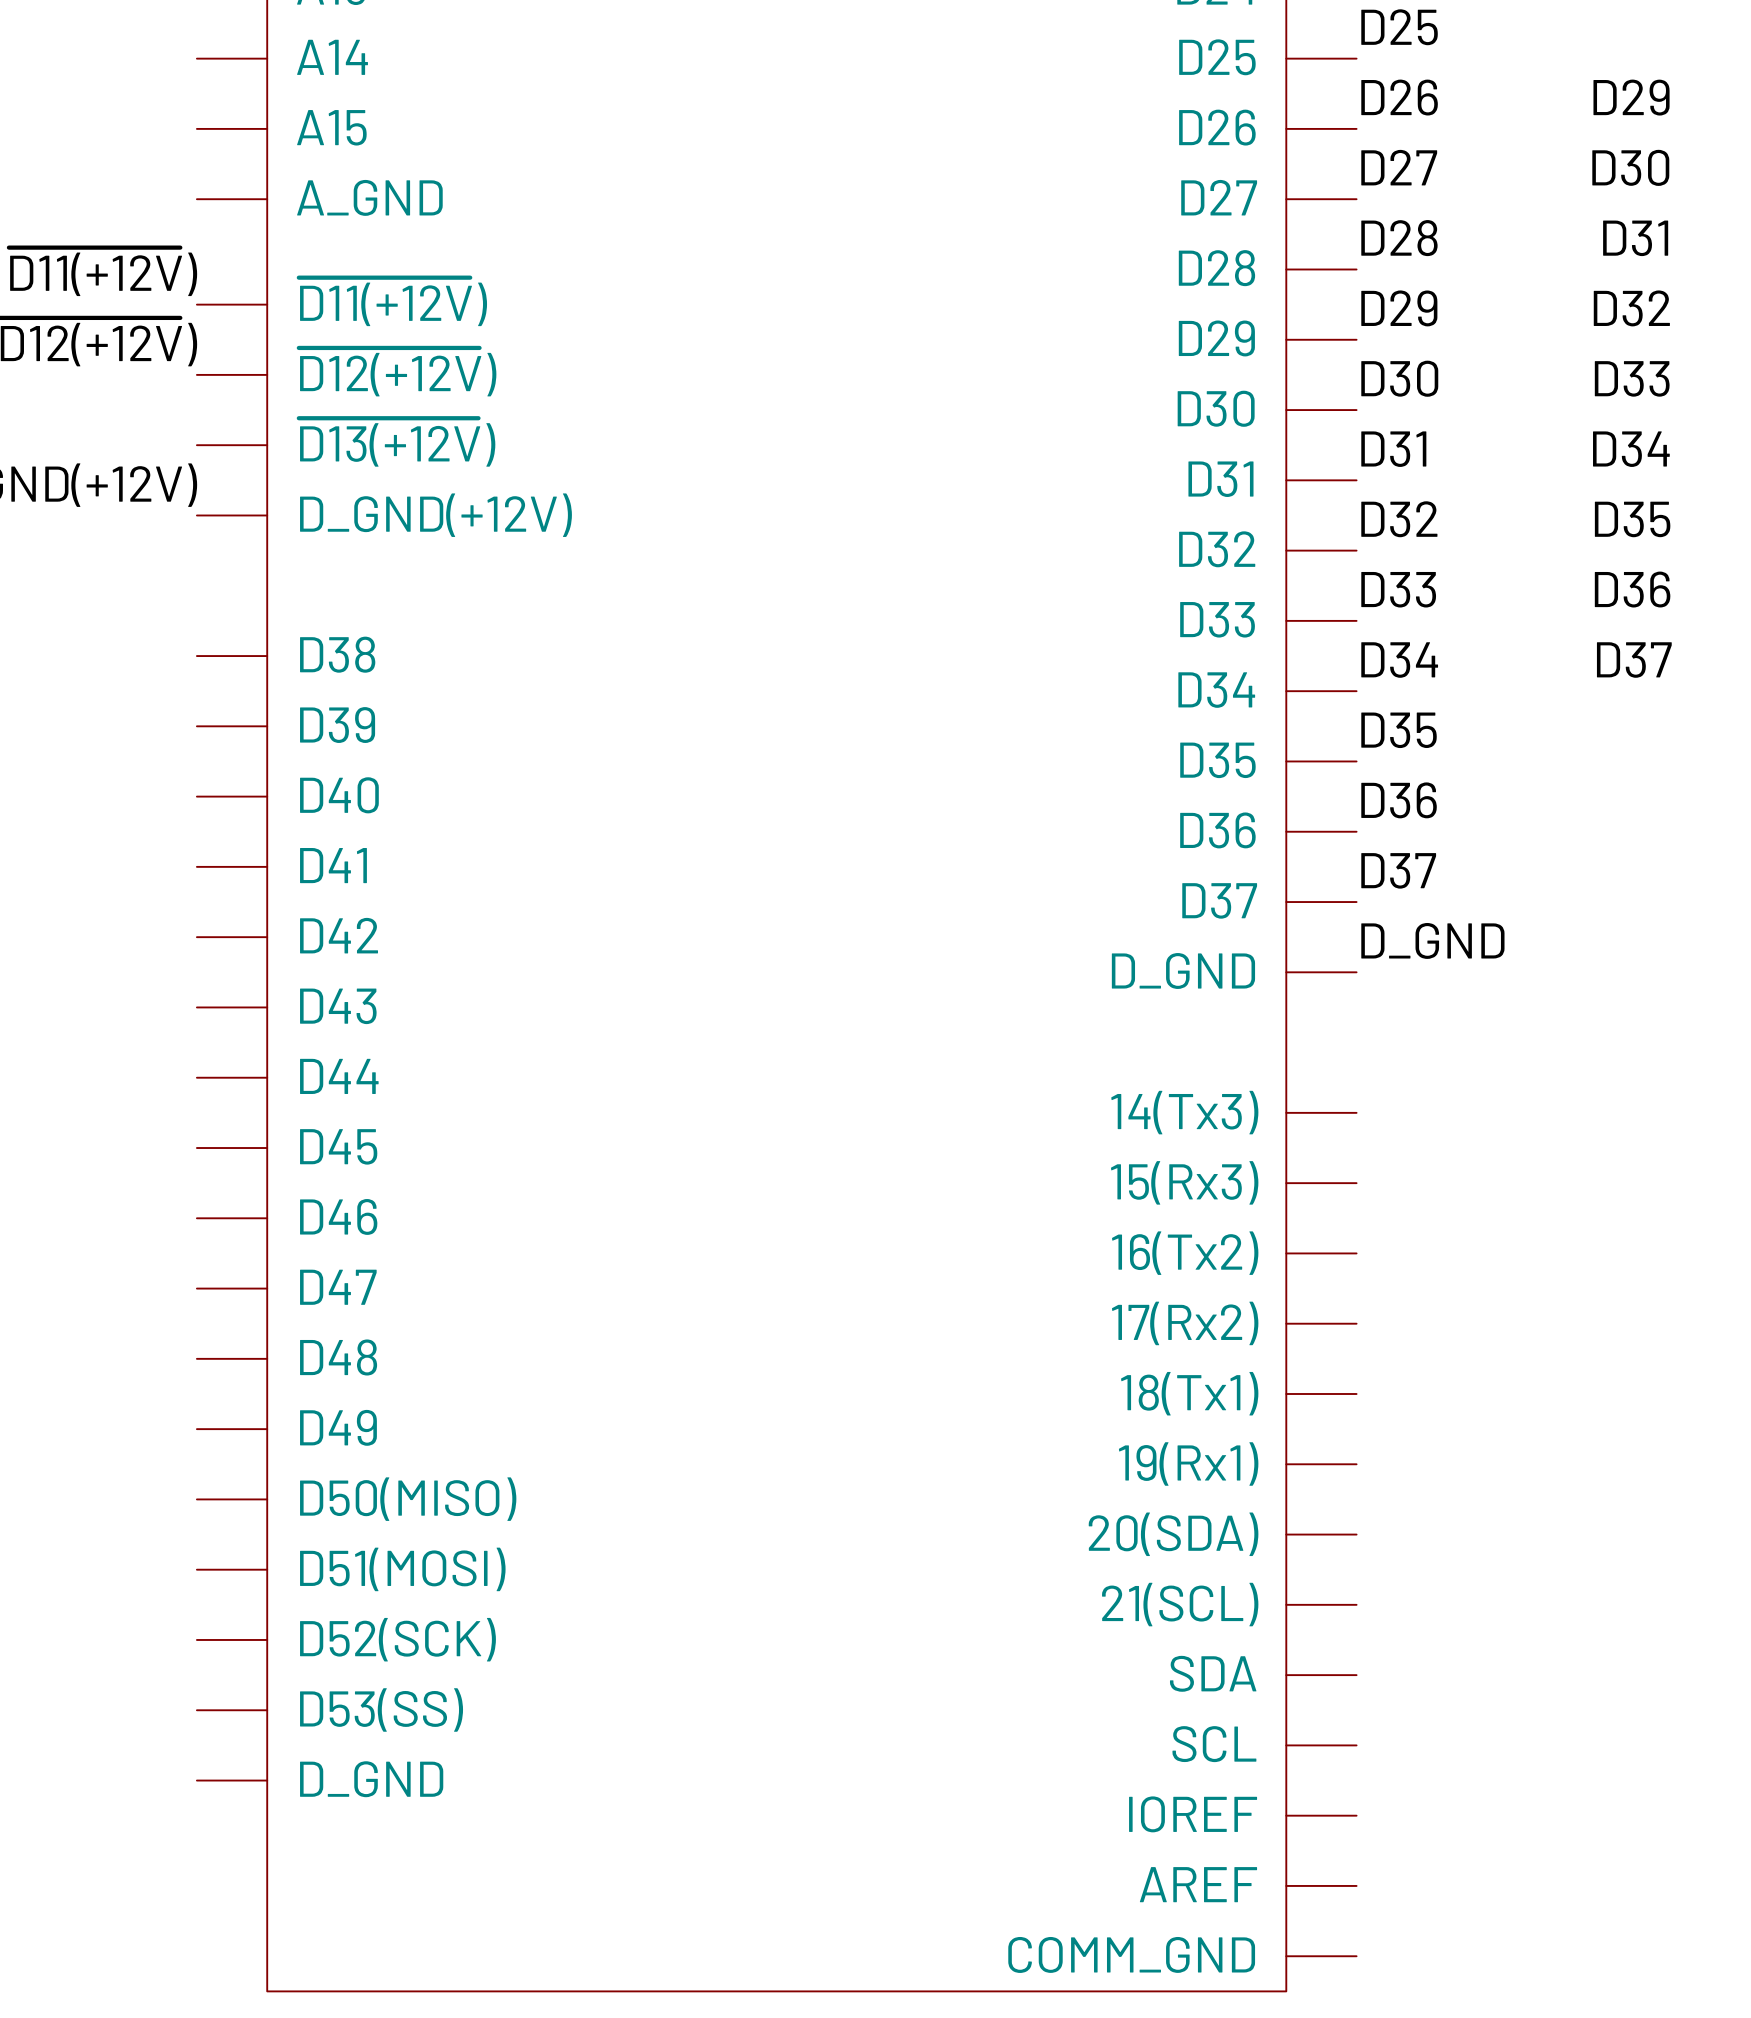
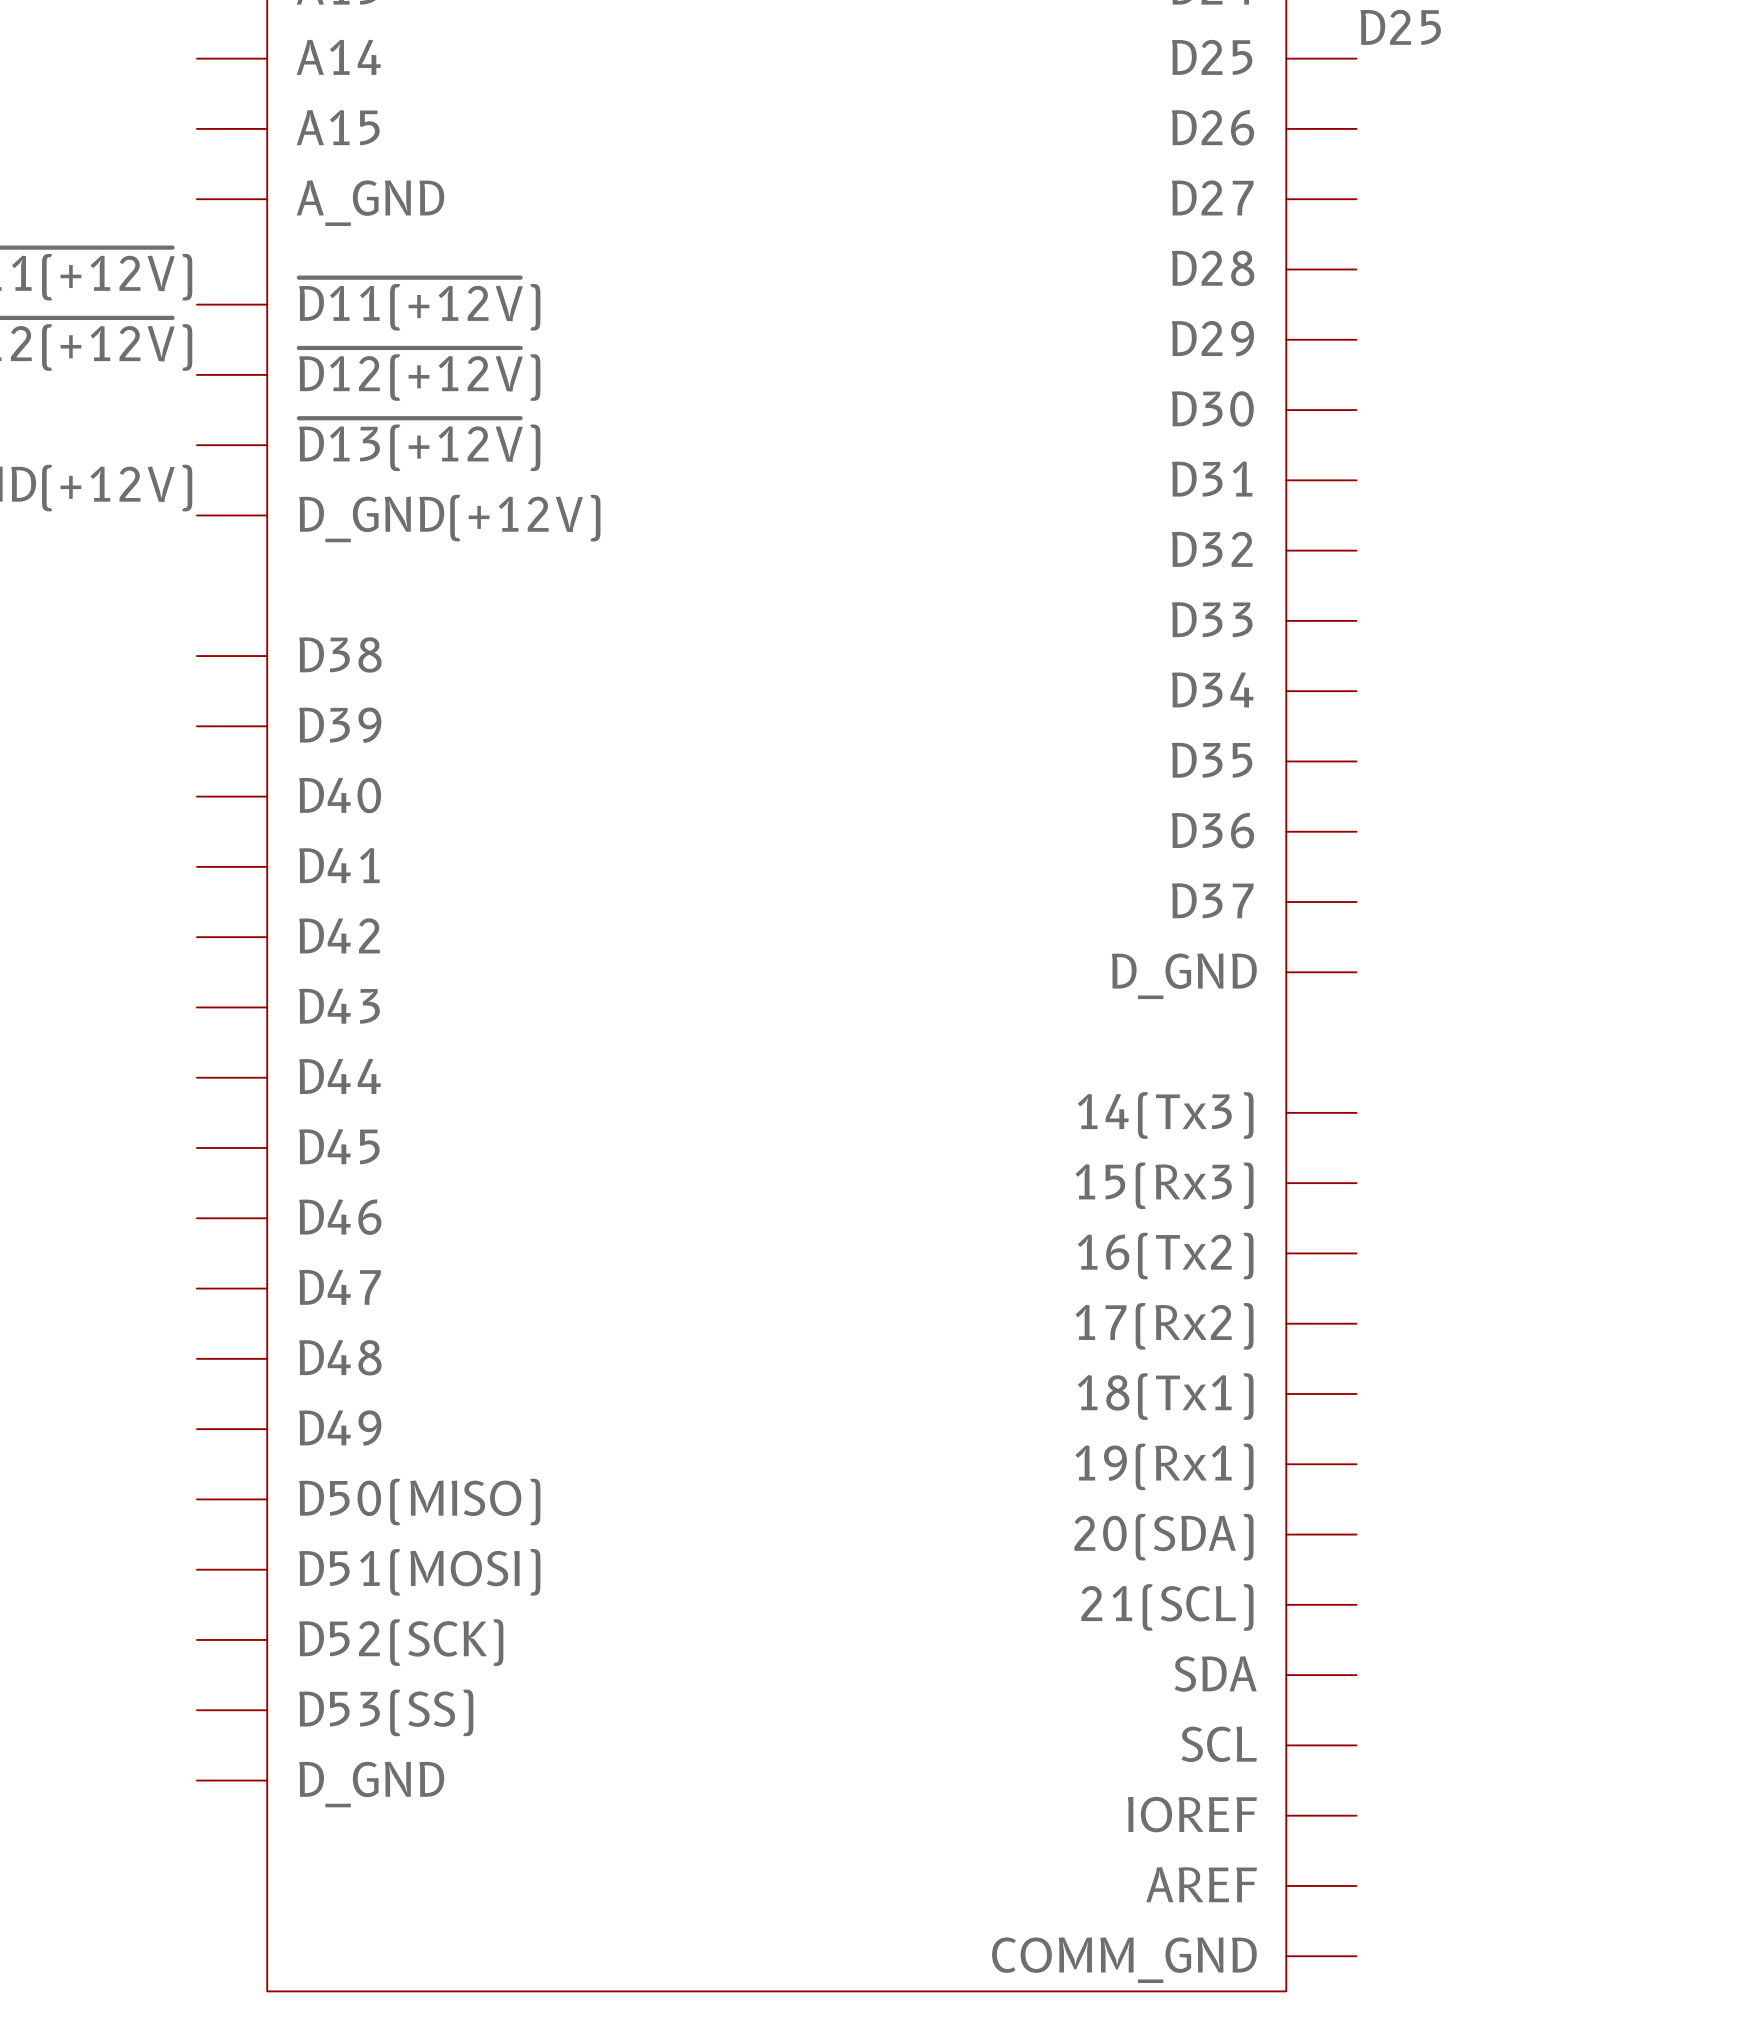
label: D26 (1399, 97) -> none
label: D29 (1631, 97) -> none
label: D27 (1399, 167) -> none
label: D30 (1630, 167) -> none
label: D28 (1399, 238) -> none
label: D31 (1635, 238) -> none
label: D29 (1399, 308) -> none
label: D32 (1631, 308) -> none
label: D30 (1399, 378) -> none
label: D33 (1632, 378) -> none
label: D31 (1393, 449) -> none
label: D34 (1631, 449) -> none
label: D32 (1399, 519) -> none
label: D35 (1632, 519) -> none
label: D33 (1398, 589) -> none
label: D36 (1632, 589) -> none
label: D34 (1399, 660) -> none
label: D37 (1634, 660) -> none
label: D35 (1399, 730) -> none
label: D36 (1399, 800) -> none
label: D37 (1398, 870) -> none
label: D_GND (1432, 940) -> none

